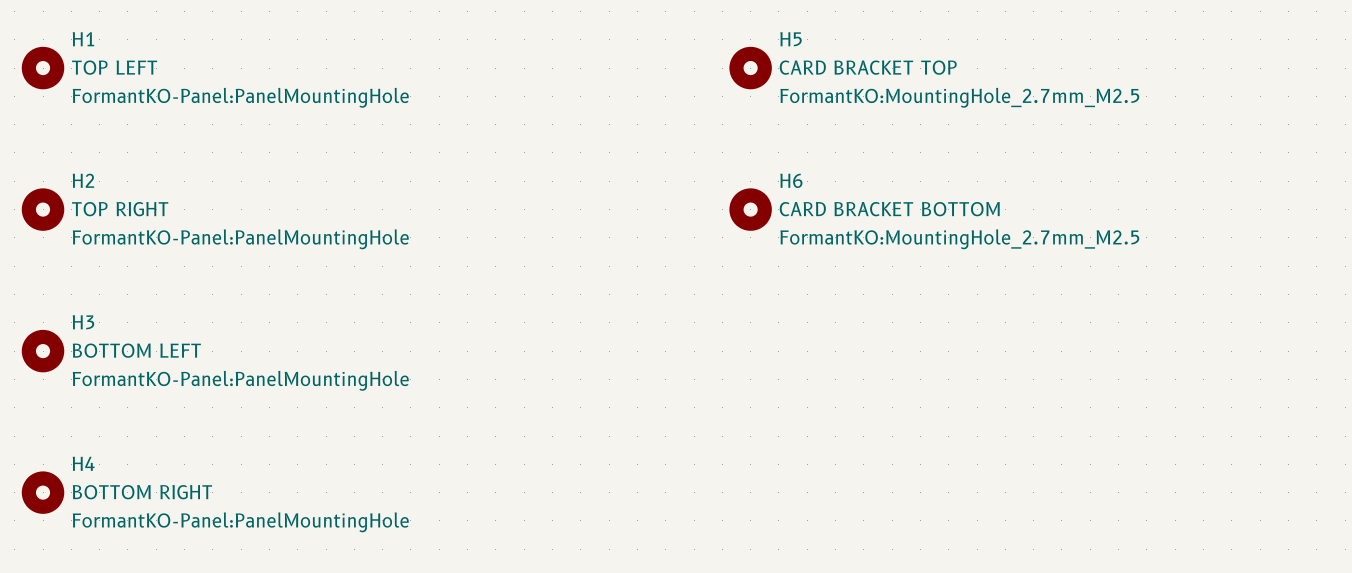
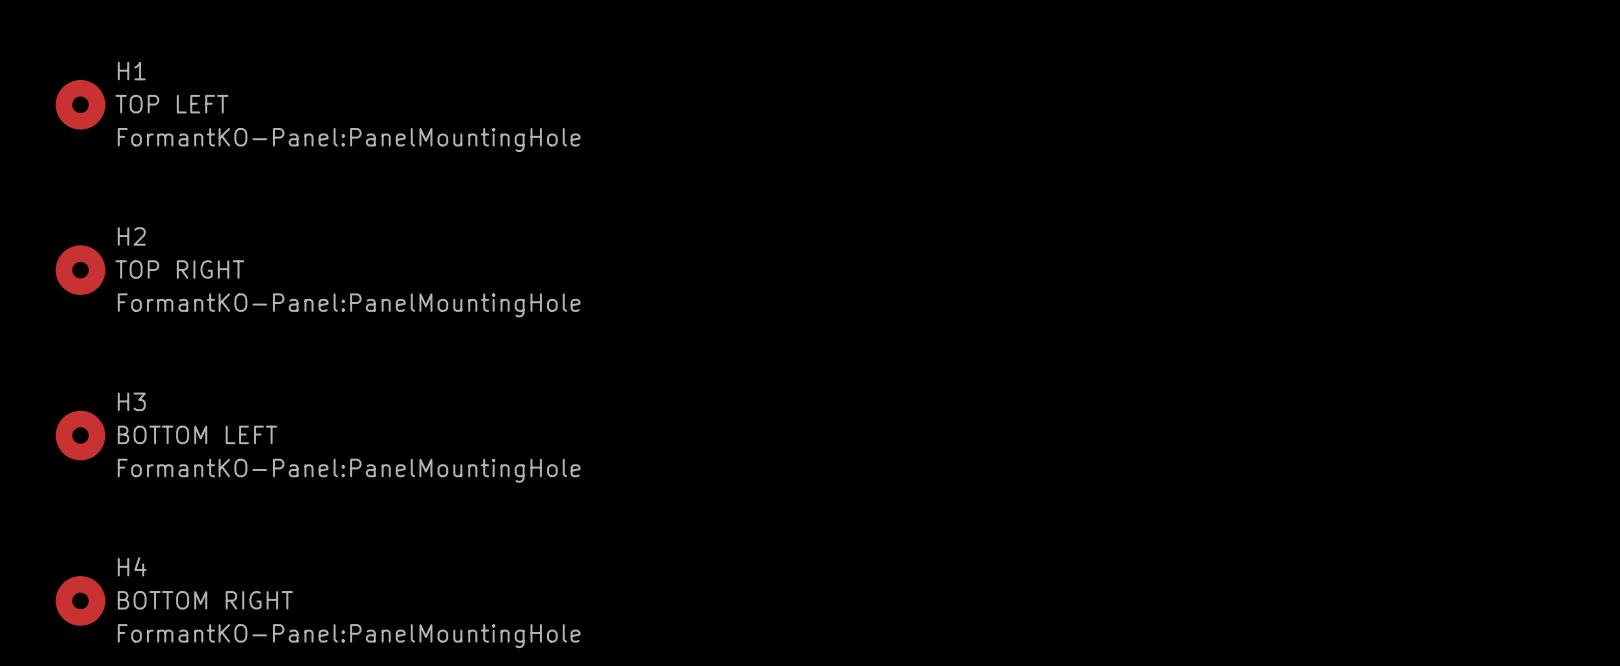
H5: CARD BRACKET TOP (750, 68) -> none
H6: CARD BRACKET BOTTOM (750, 209) -> none

